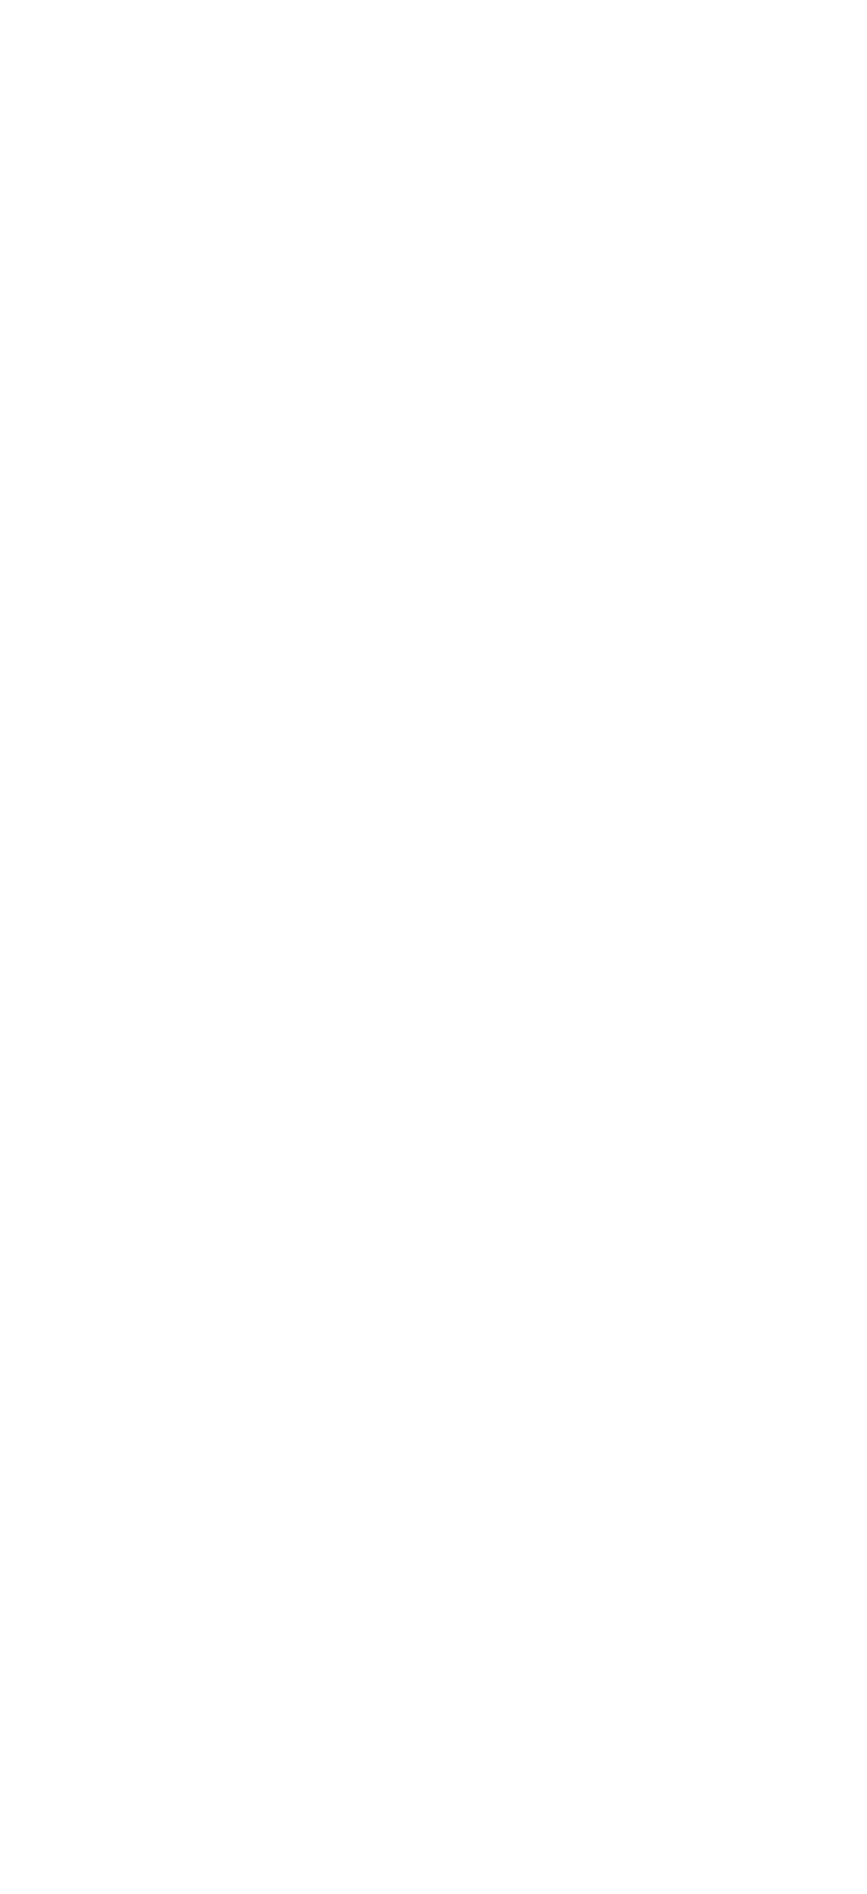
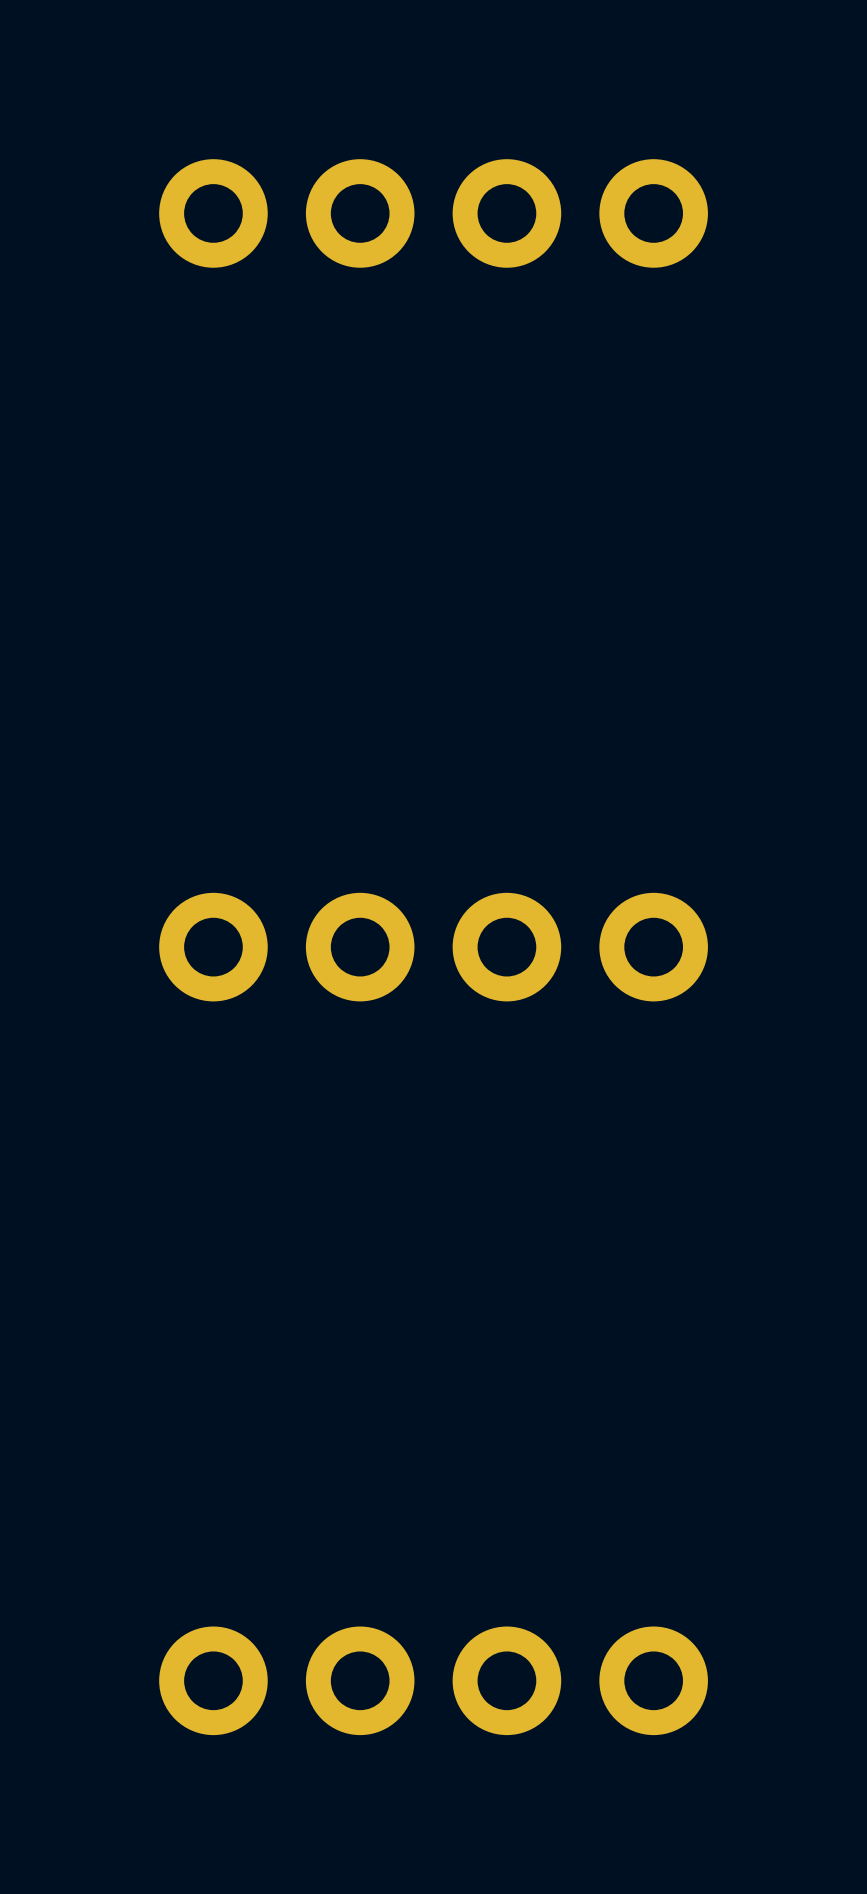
part: none -> (433, 213)
part: none -> (433, 947)
part: none -> (433, 1680)

